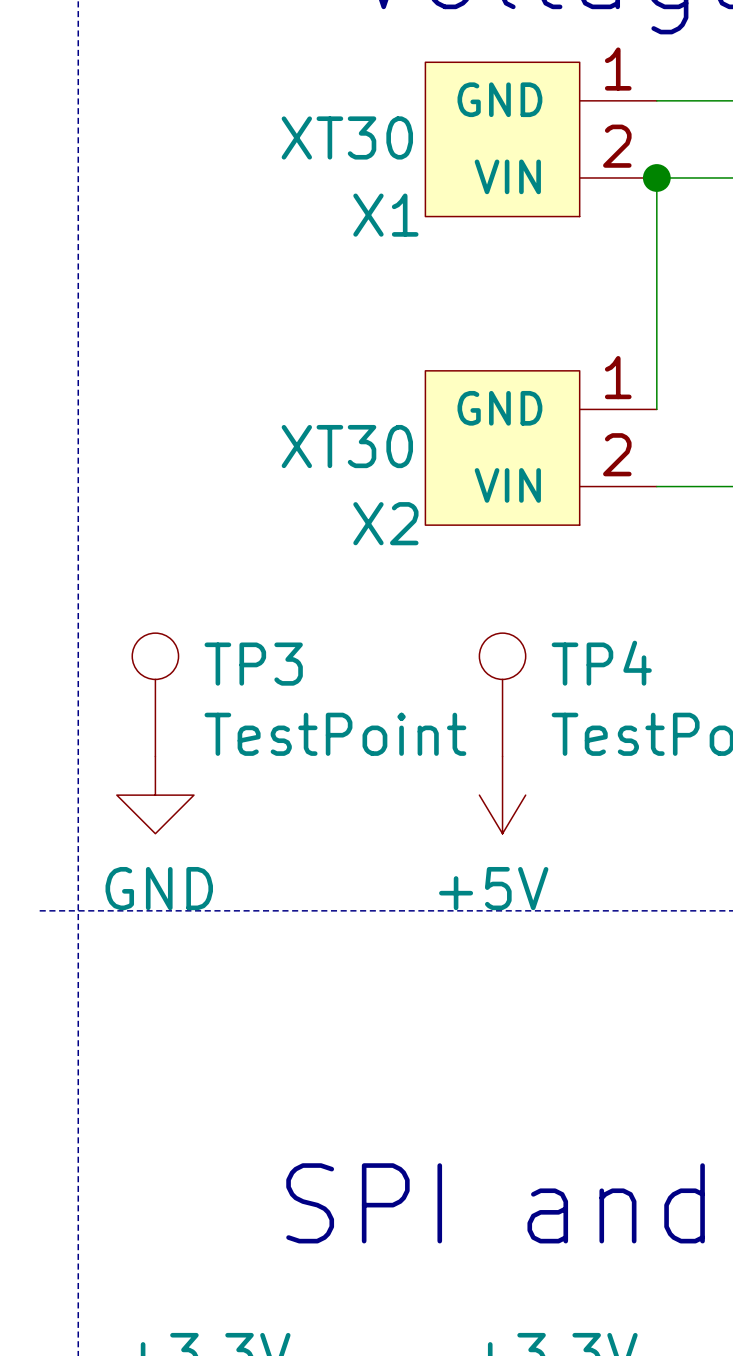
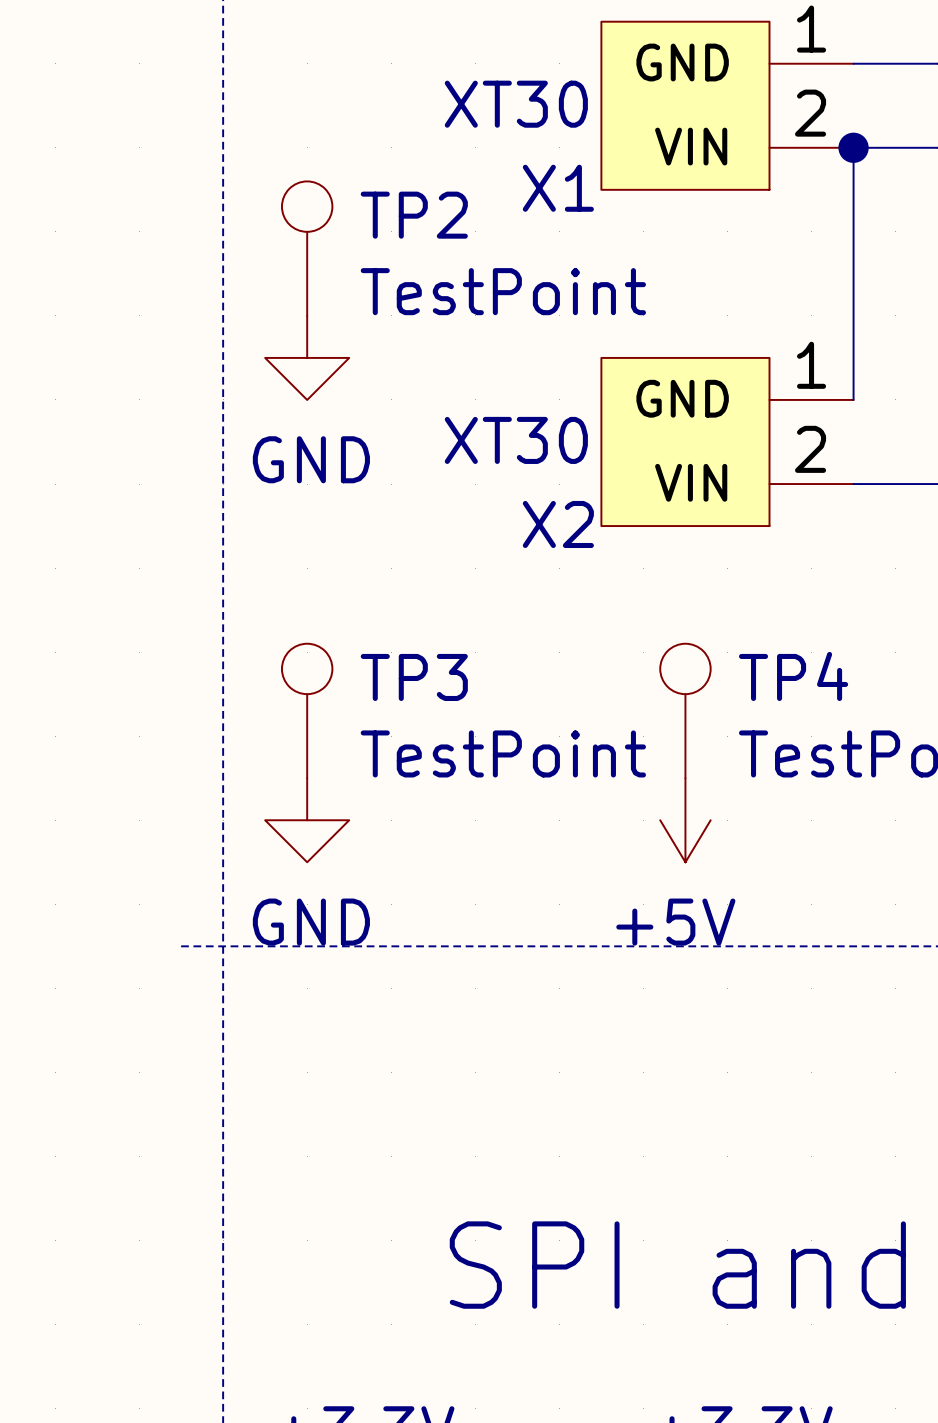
TP2: none -> TestPoint (307, 248)
power symbol: none -> GND (307, 357)

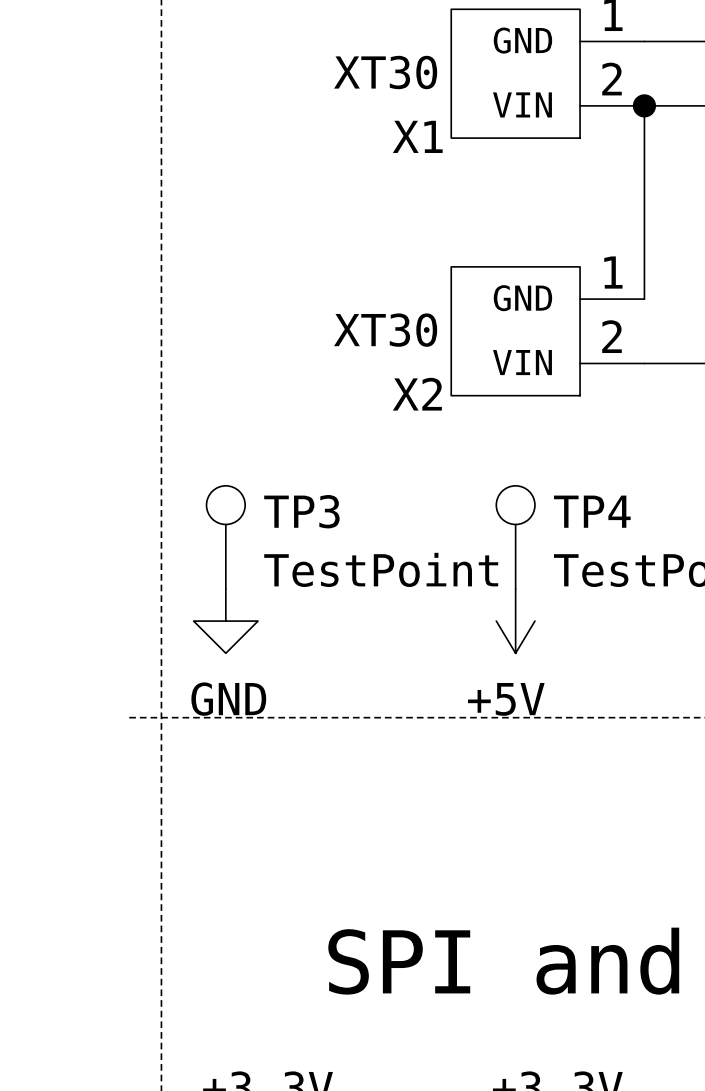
TP2: TestPoint (307, 248) -> none
power symbol: GND (307, 357) -> none

